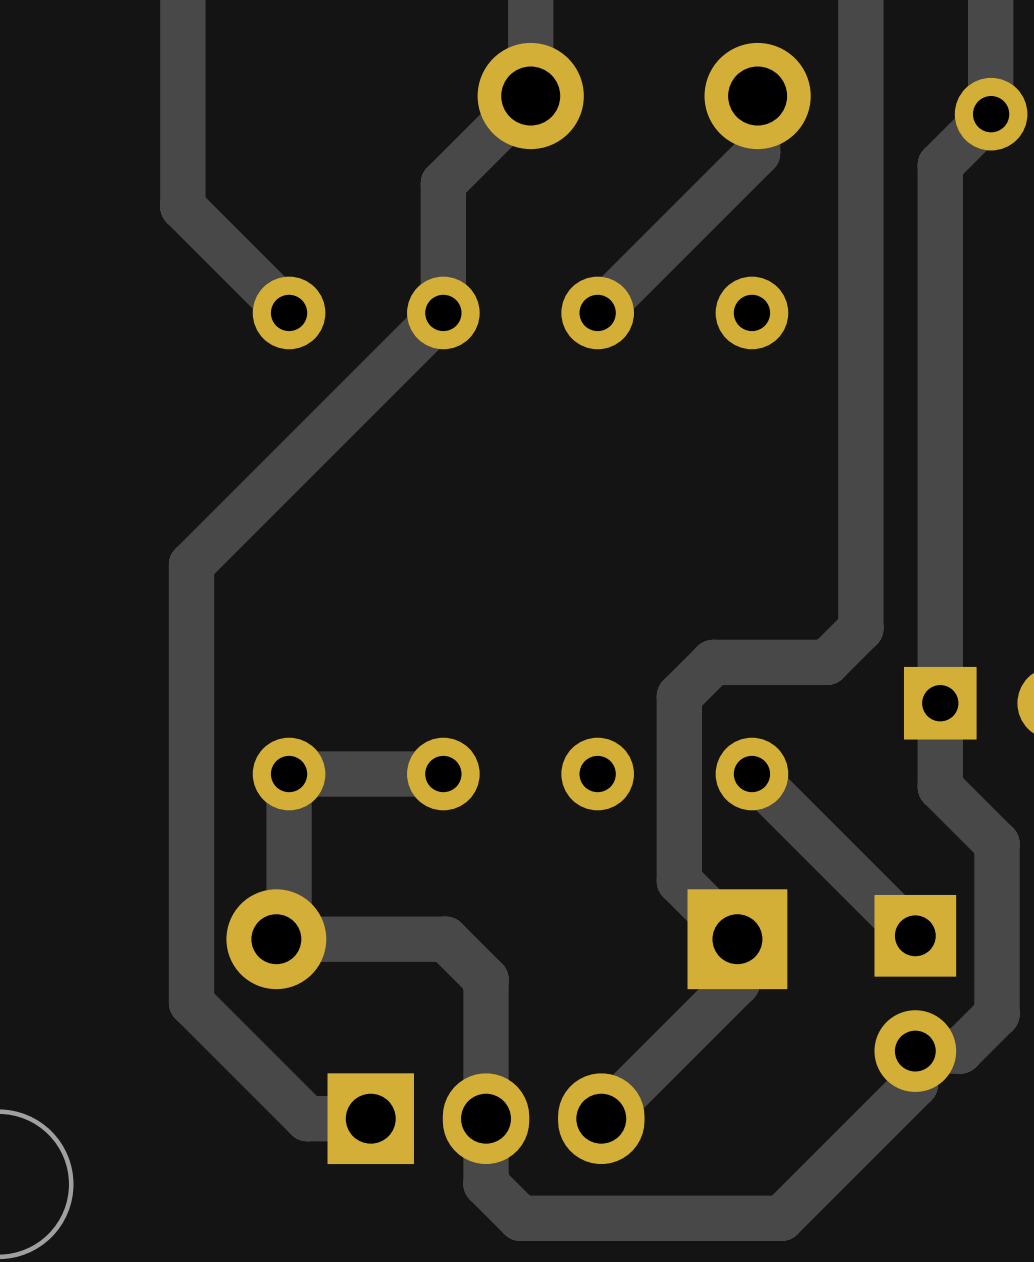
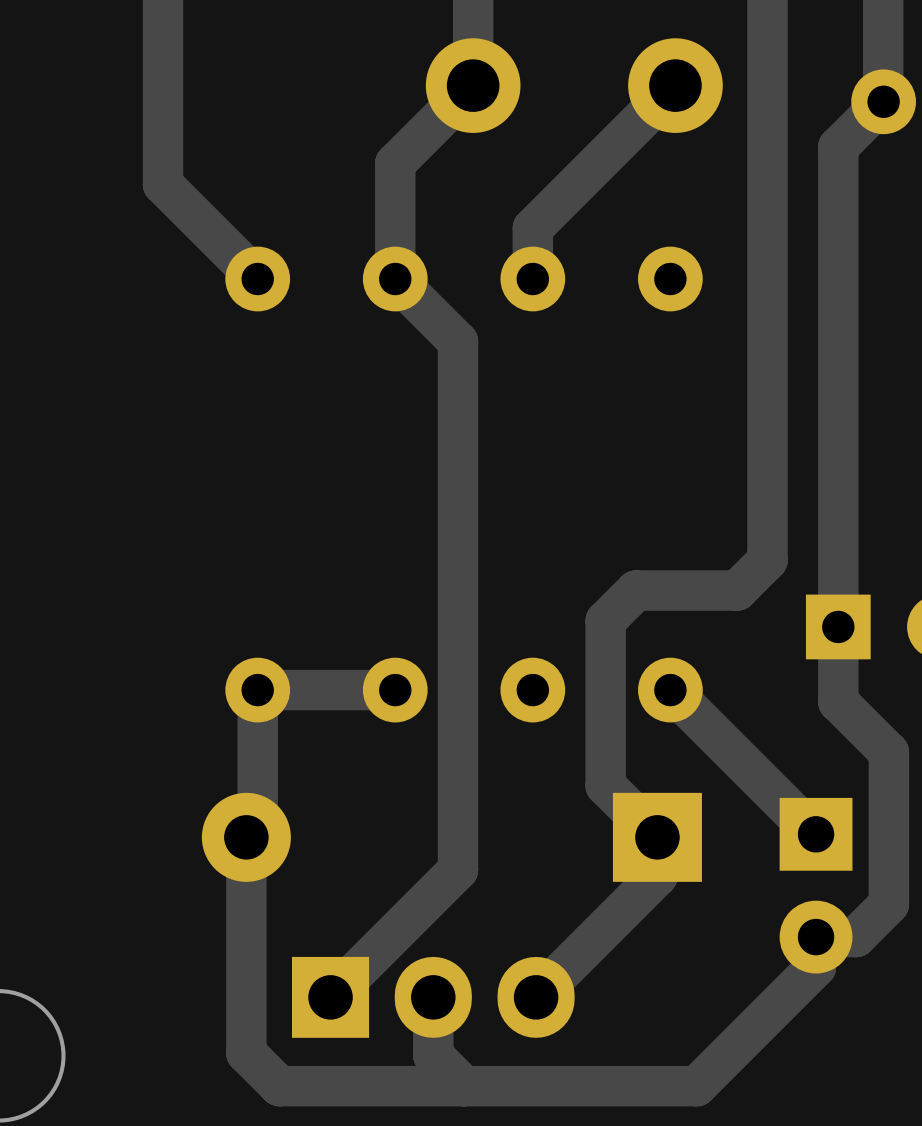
track: (757, 96) (757, 152) (597, 312) -> (675, 85) (532, 228) (532, 279)
track: (443, 312) (191, 564) (191, 1002) (307, 1118) (370, 1118) -> (395, 279) (458, 341) (458, 869) (330, 997)
track: (276, 939) (445, 939) (486, 979) (486, 1118) -> (246, 837) (246, 1052) (279, 1086) (464, 1086)

